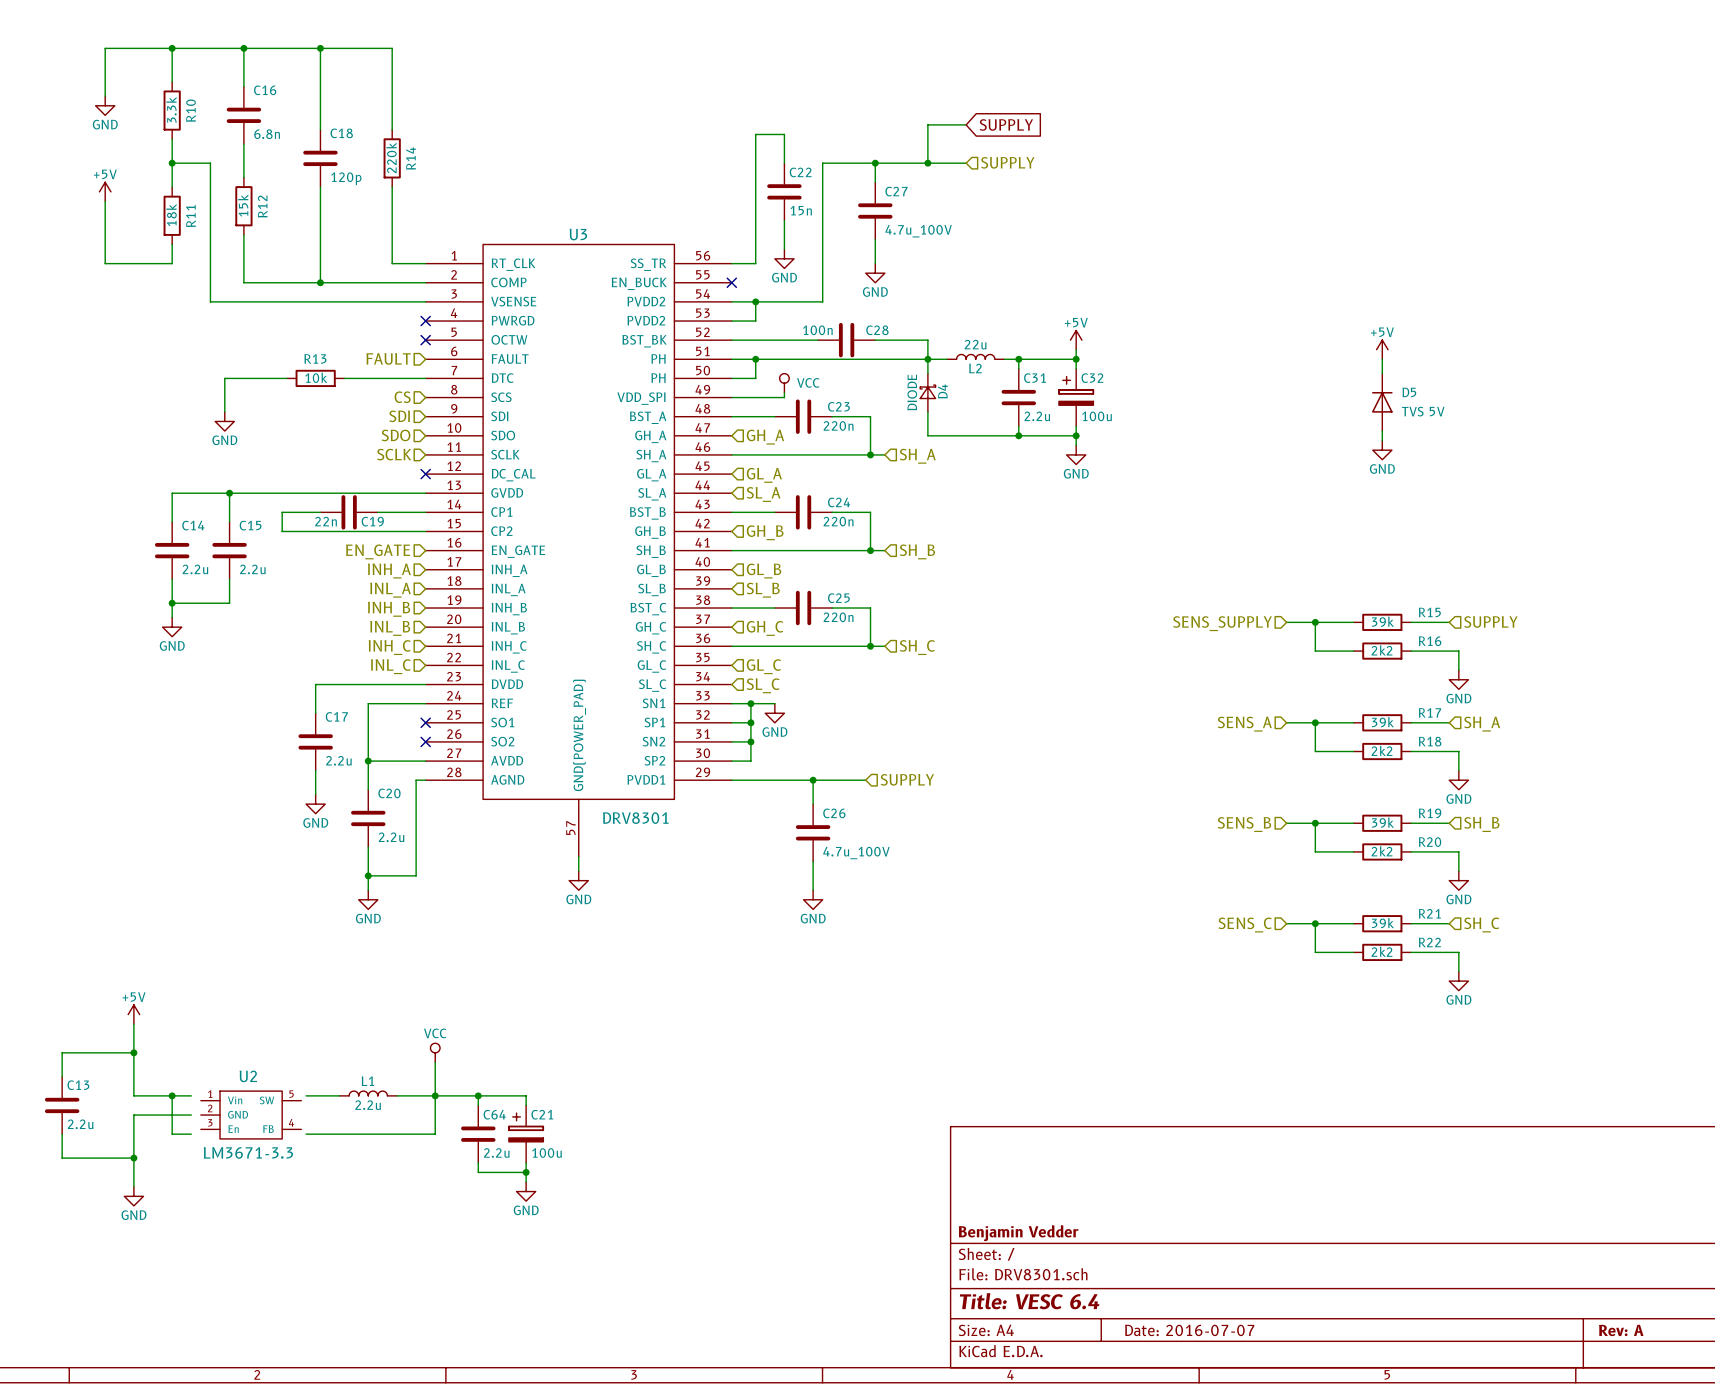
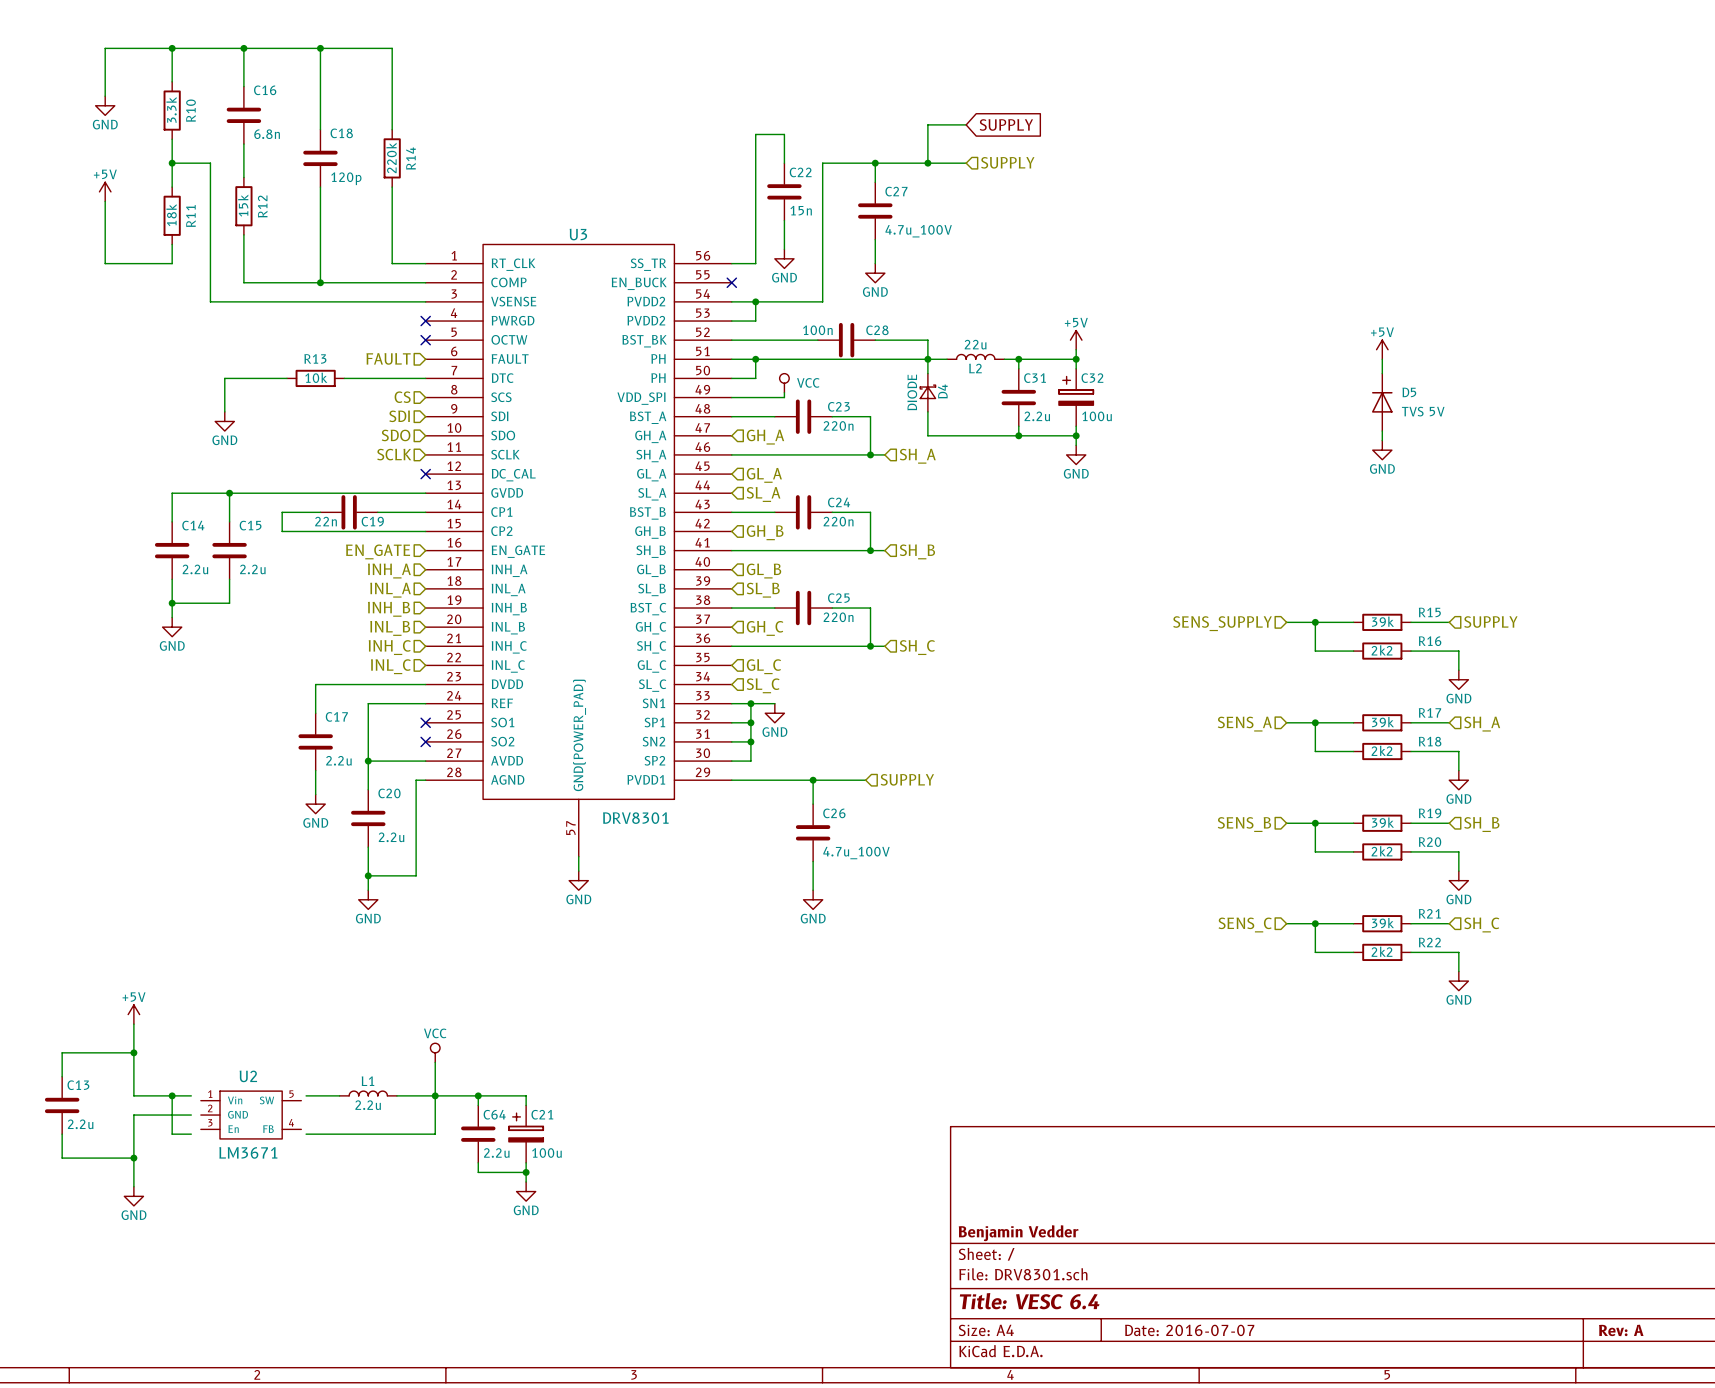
U2 value: LM3671-3.3 (248, 1152) -> LM3671 (248, 1152)

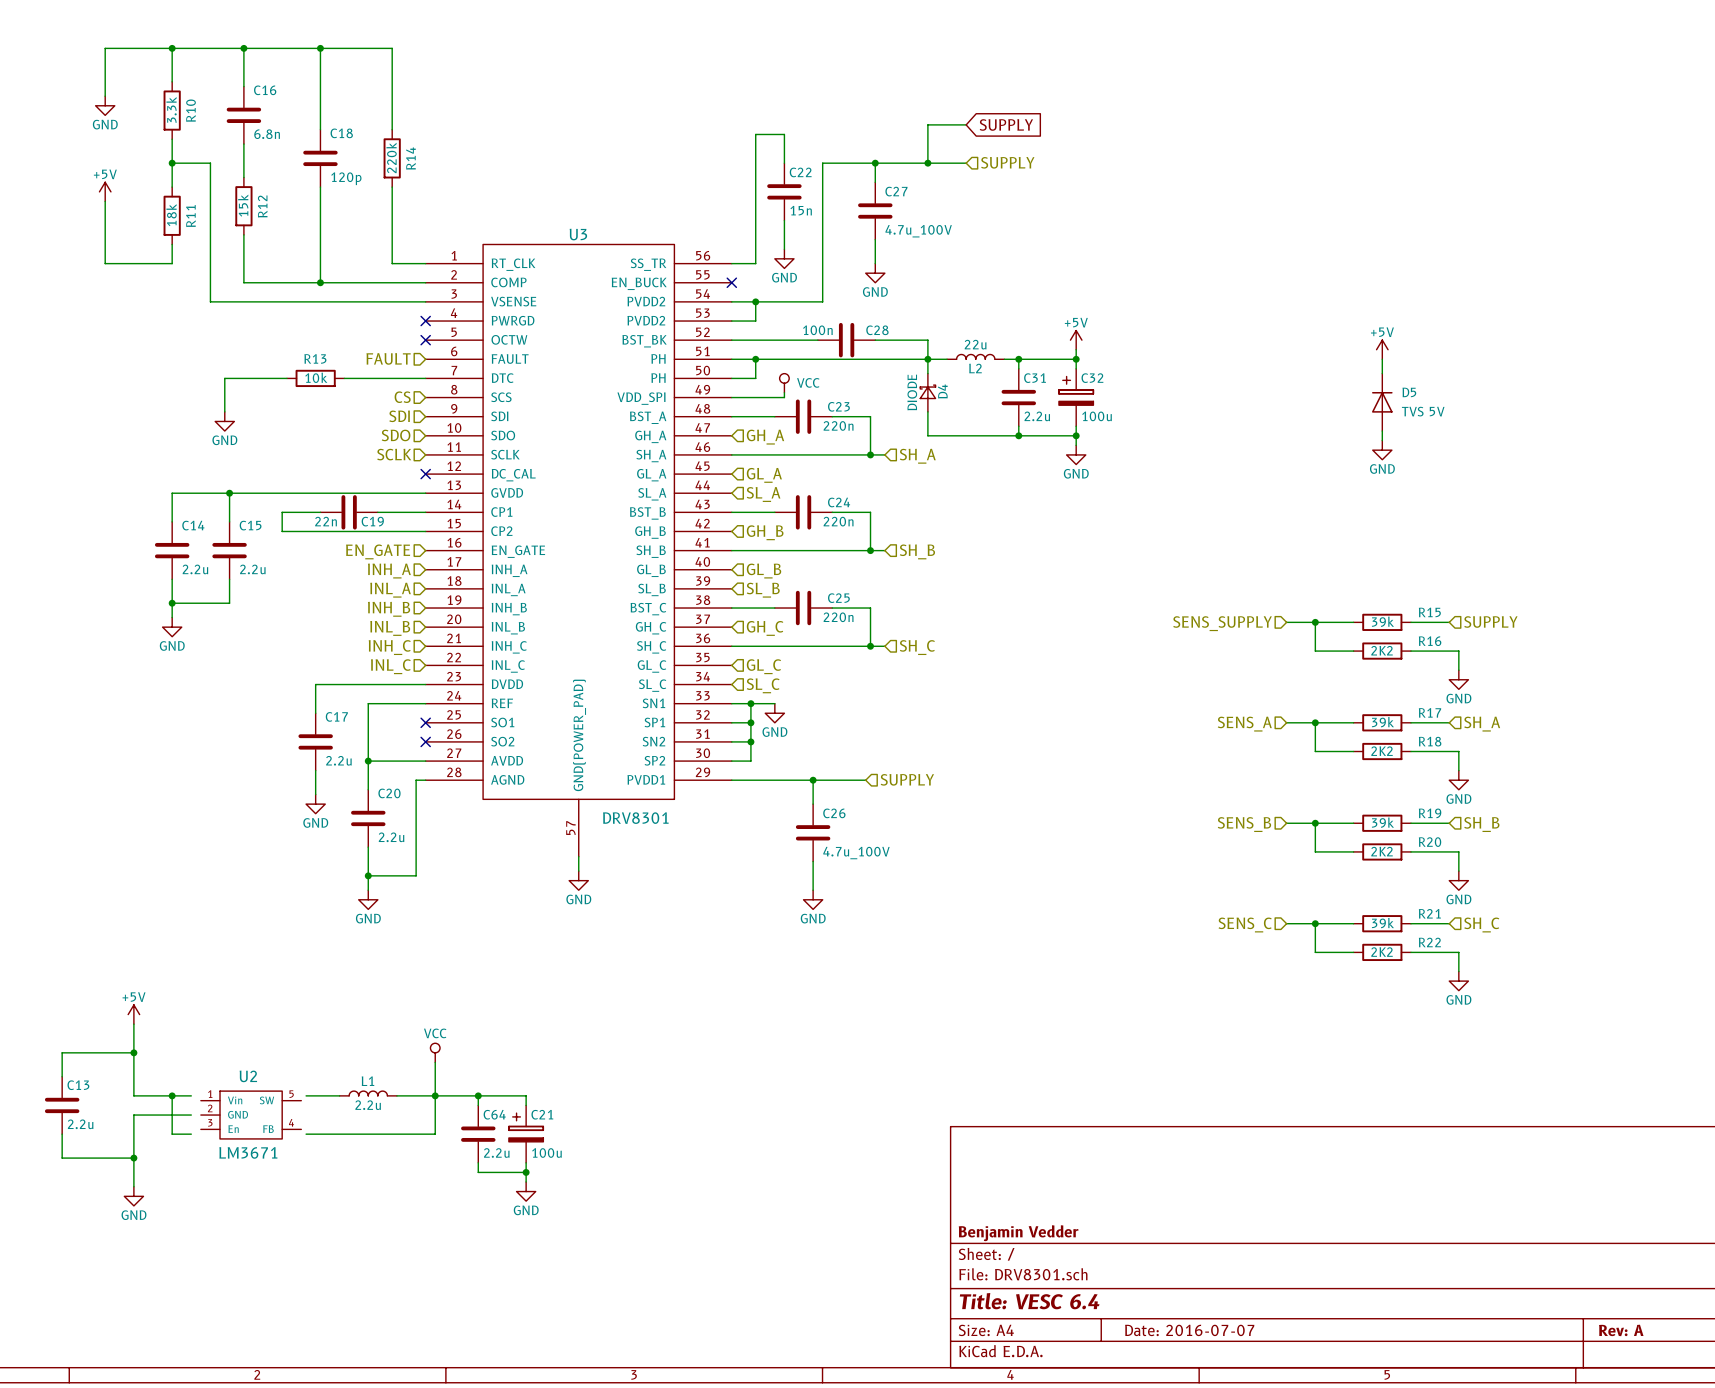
R16 value: 2k2 (1382, 650) -> 2K2 (1382, 650)
R18 value: 2k2 (1382, 750) -> 2K2 (1382, 751)
R20 value: 2k2 (1382, 851) -> 2K2 (1382, 851)
R22 value: 2k2 (1382, 951) -> 2K2 (1382, 952)

